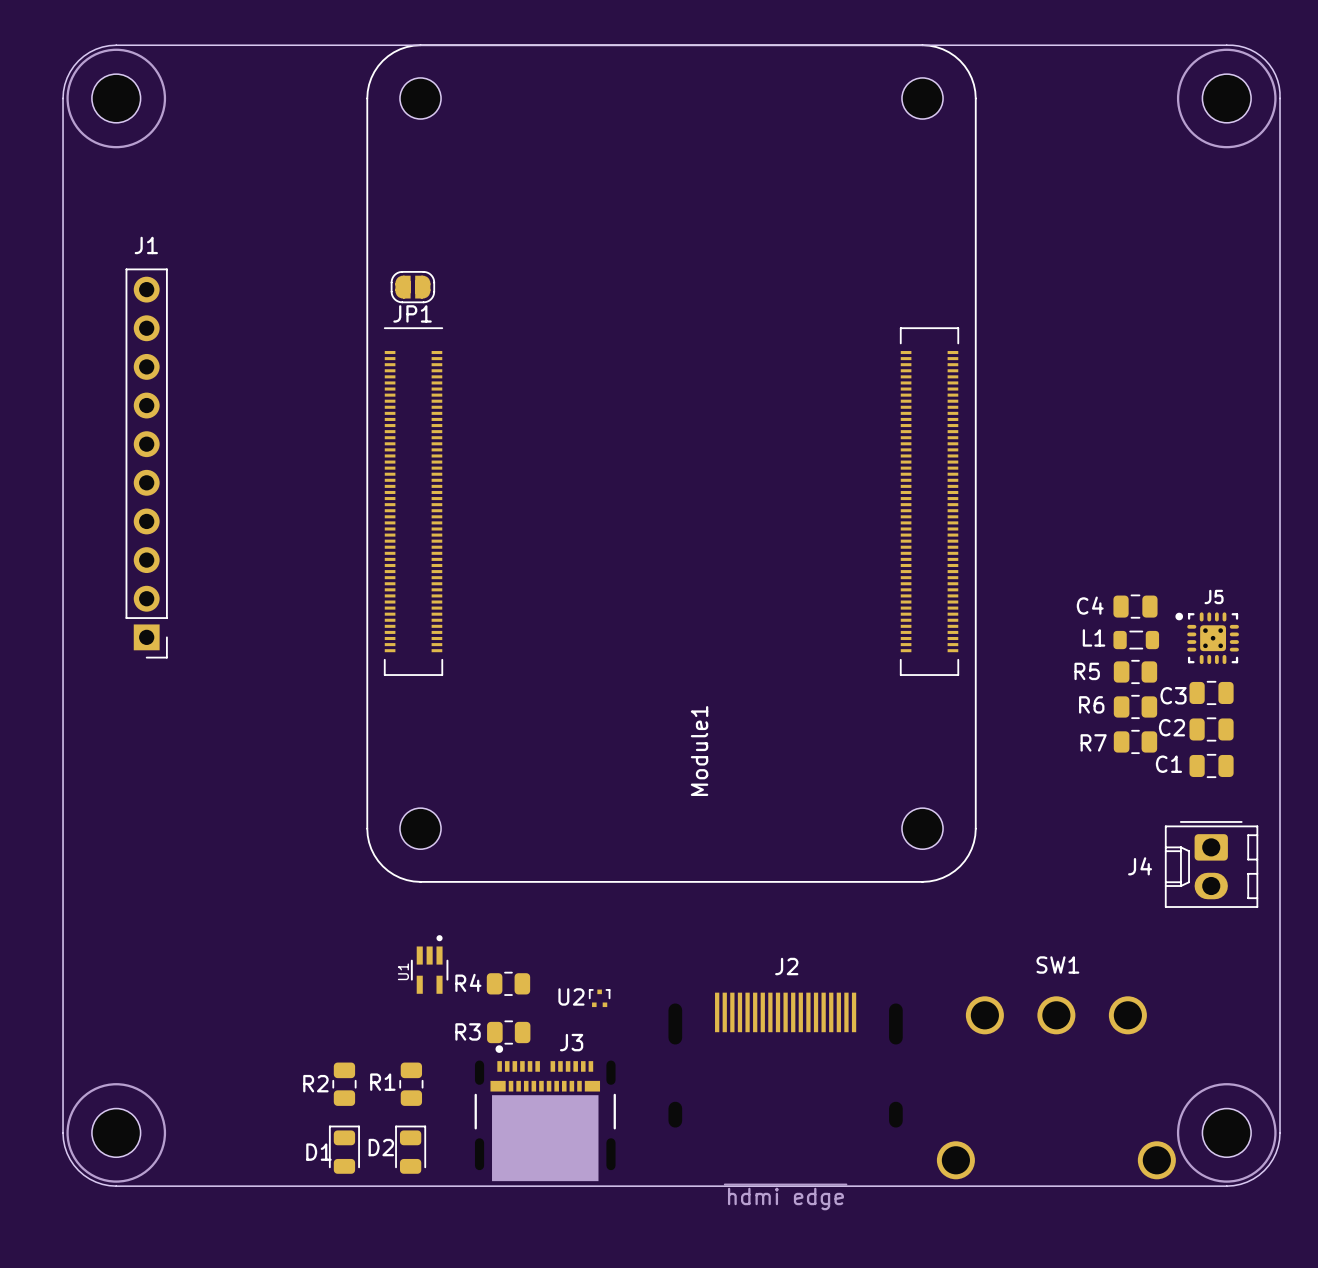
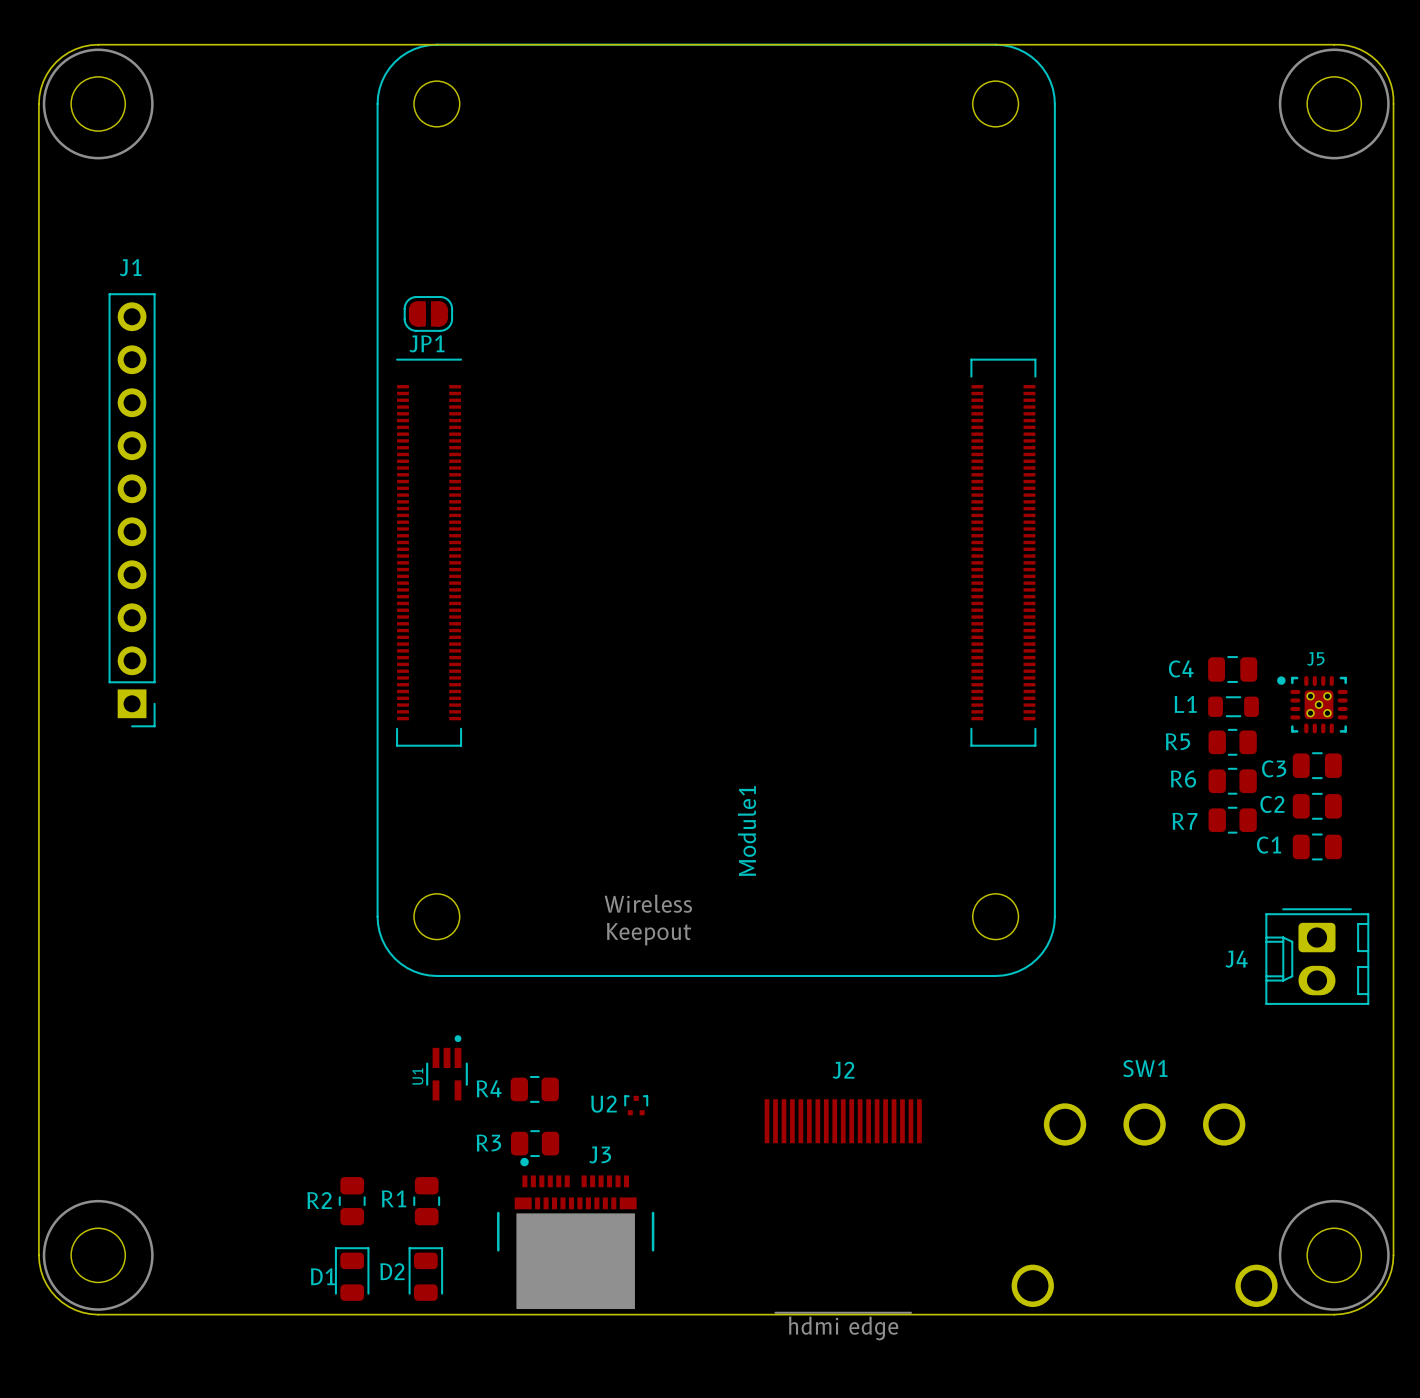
text: none -> Wireless (648, 903)
text: none -> Keepout (648, 934)

